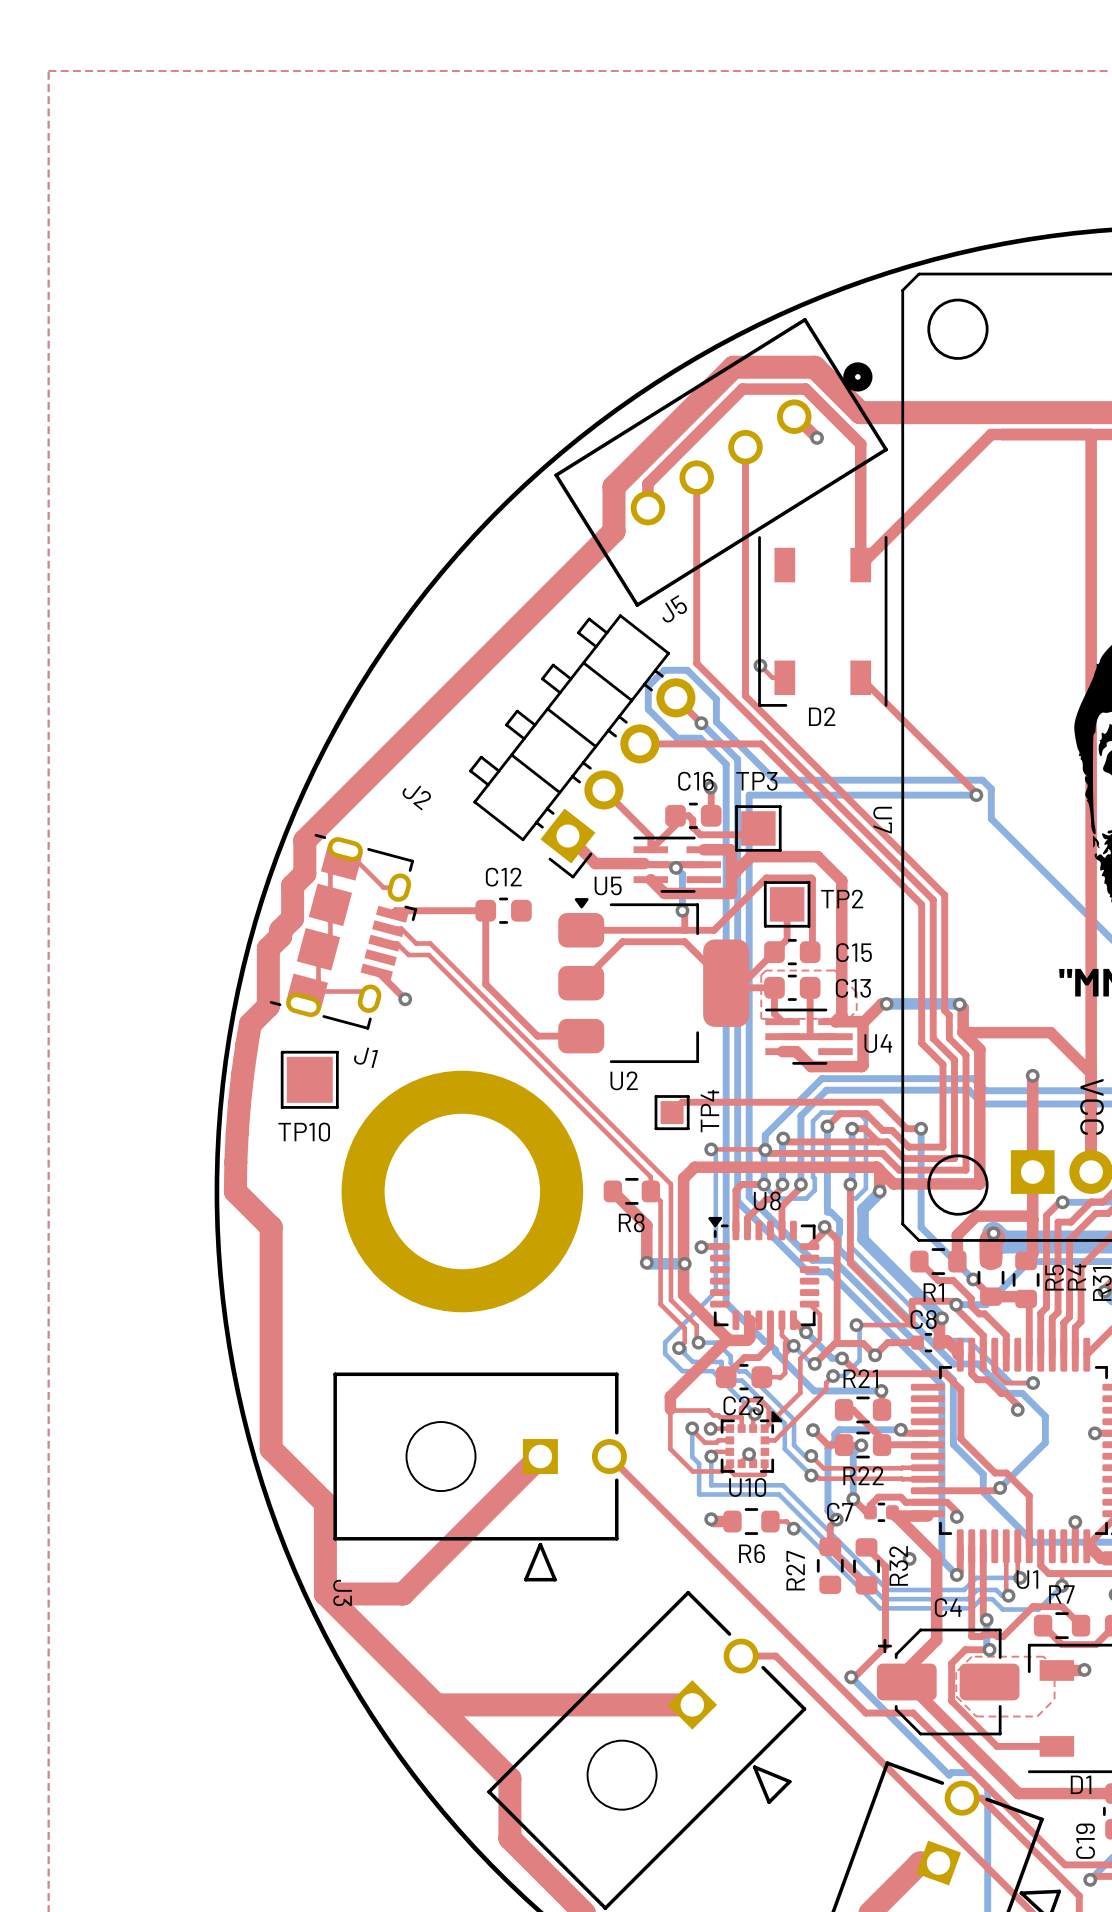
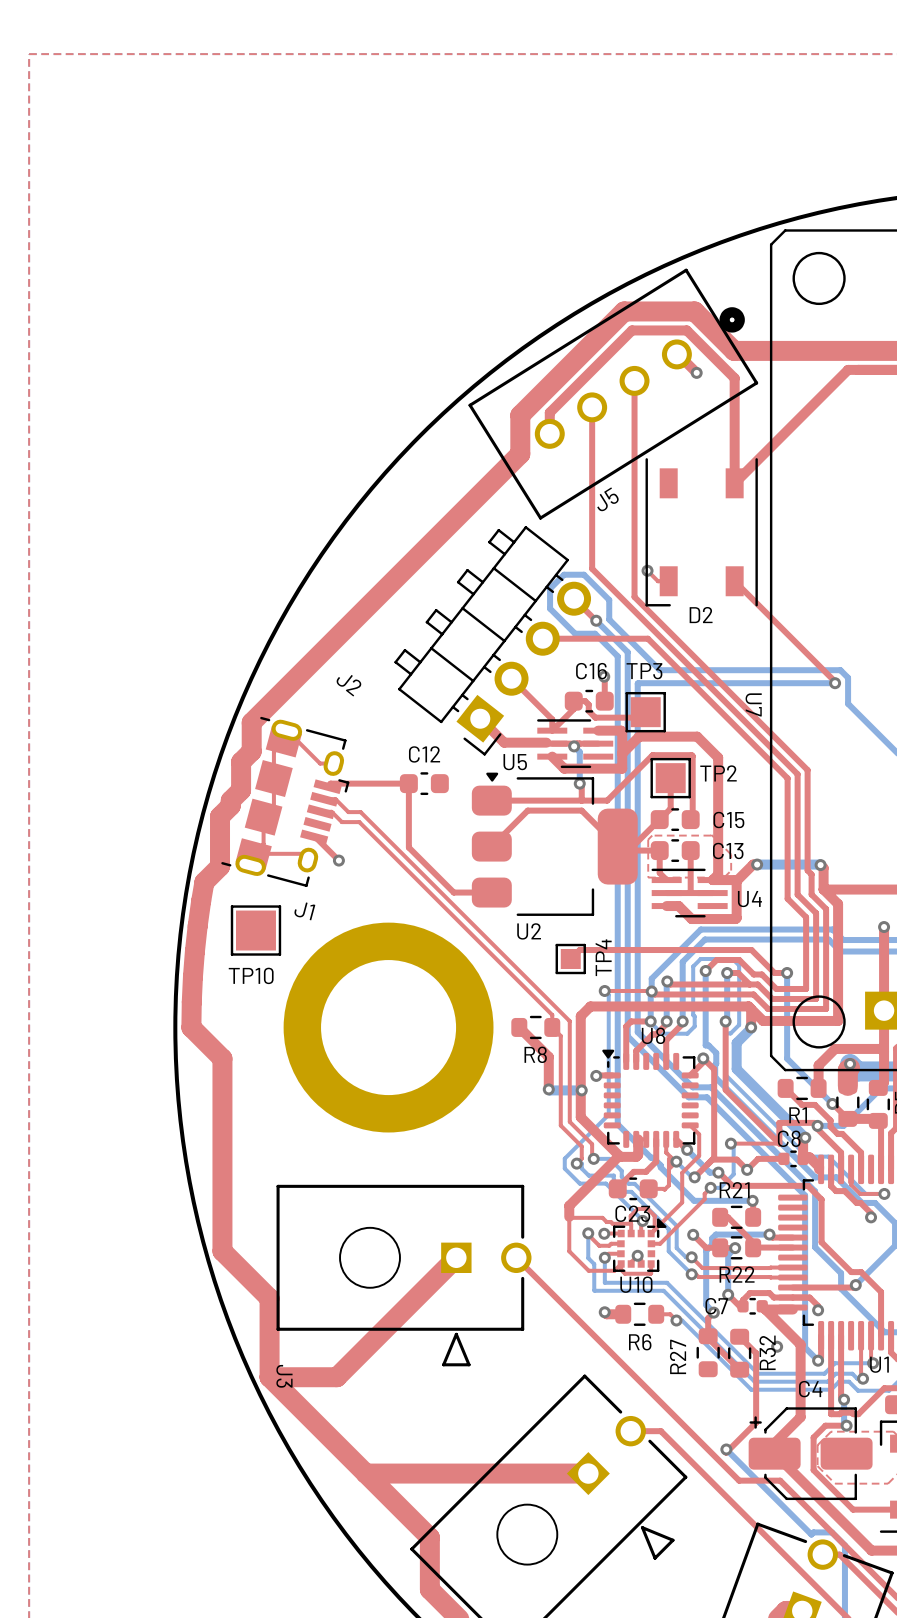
J5 name position: J5 (674, 608) -> J5 (608, 499)

